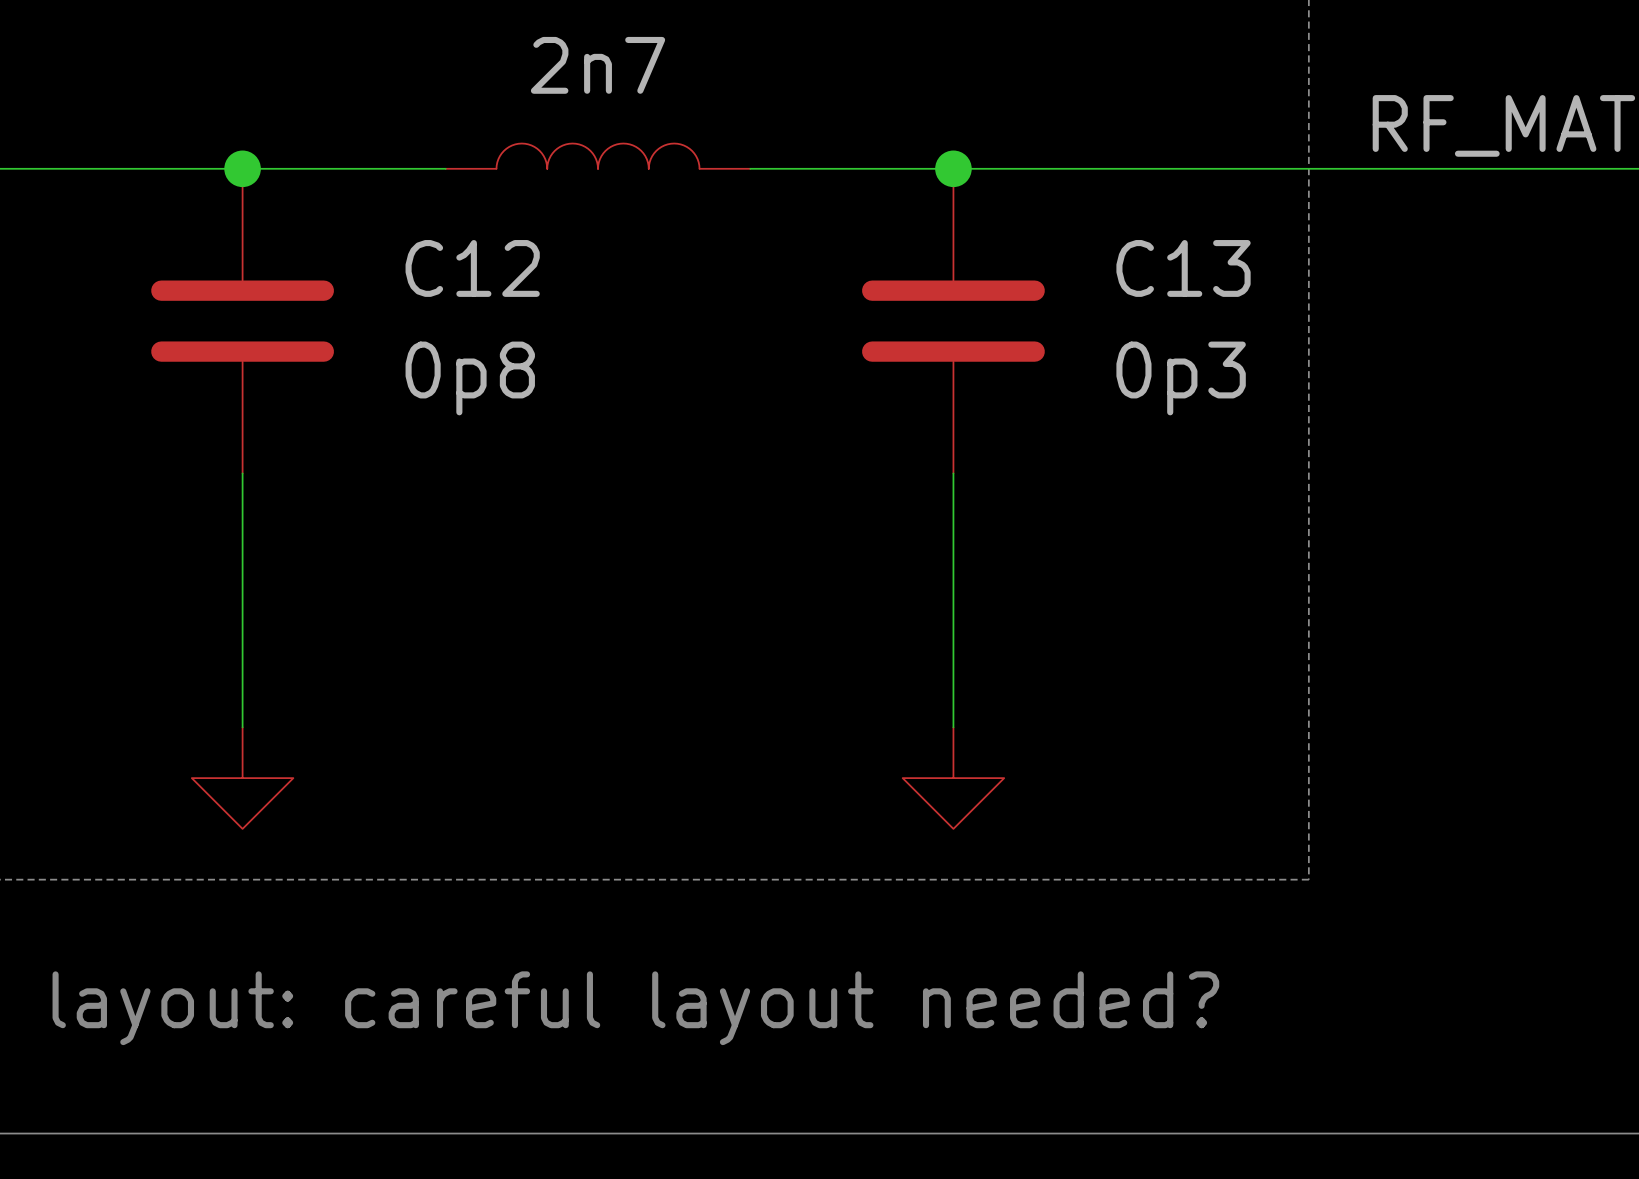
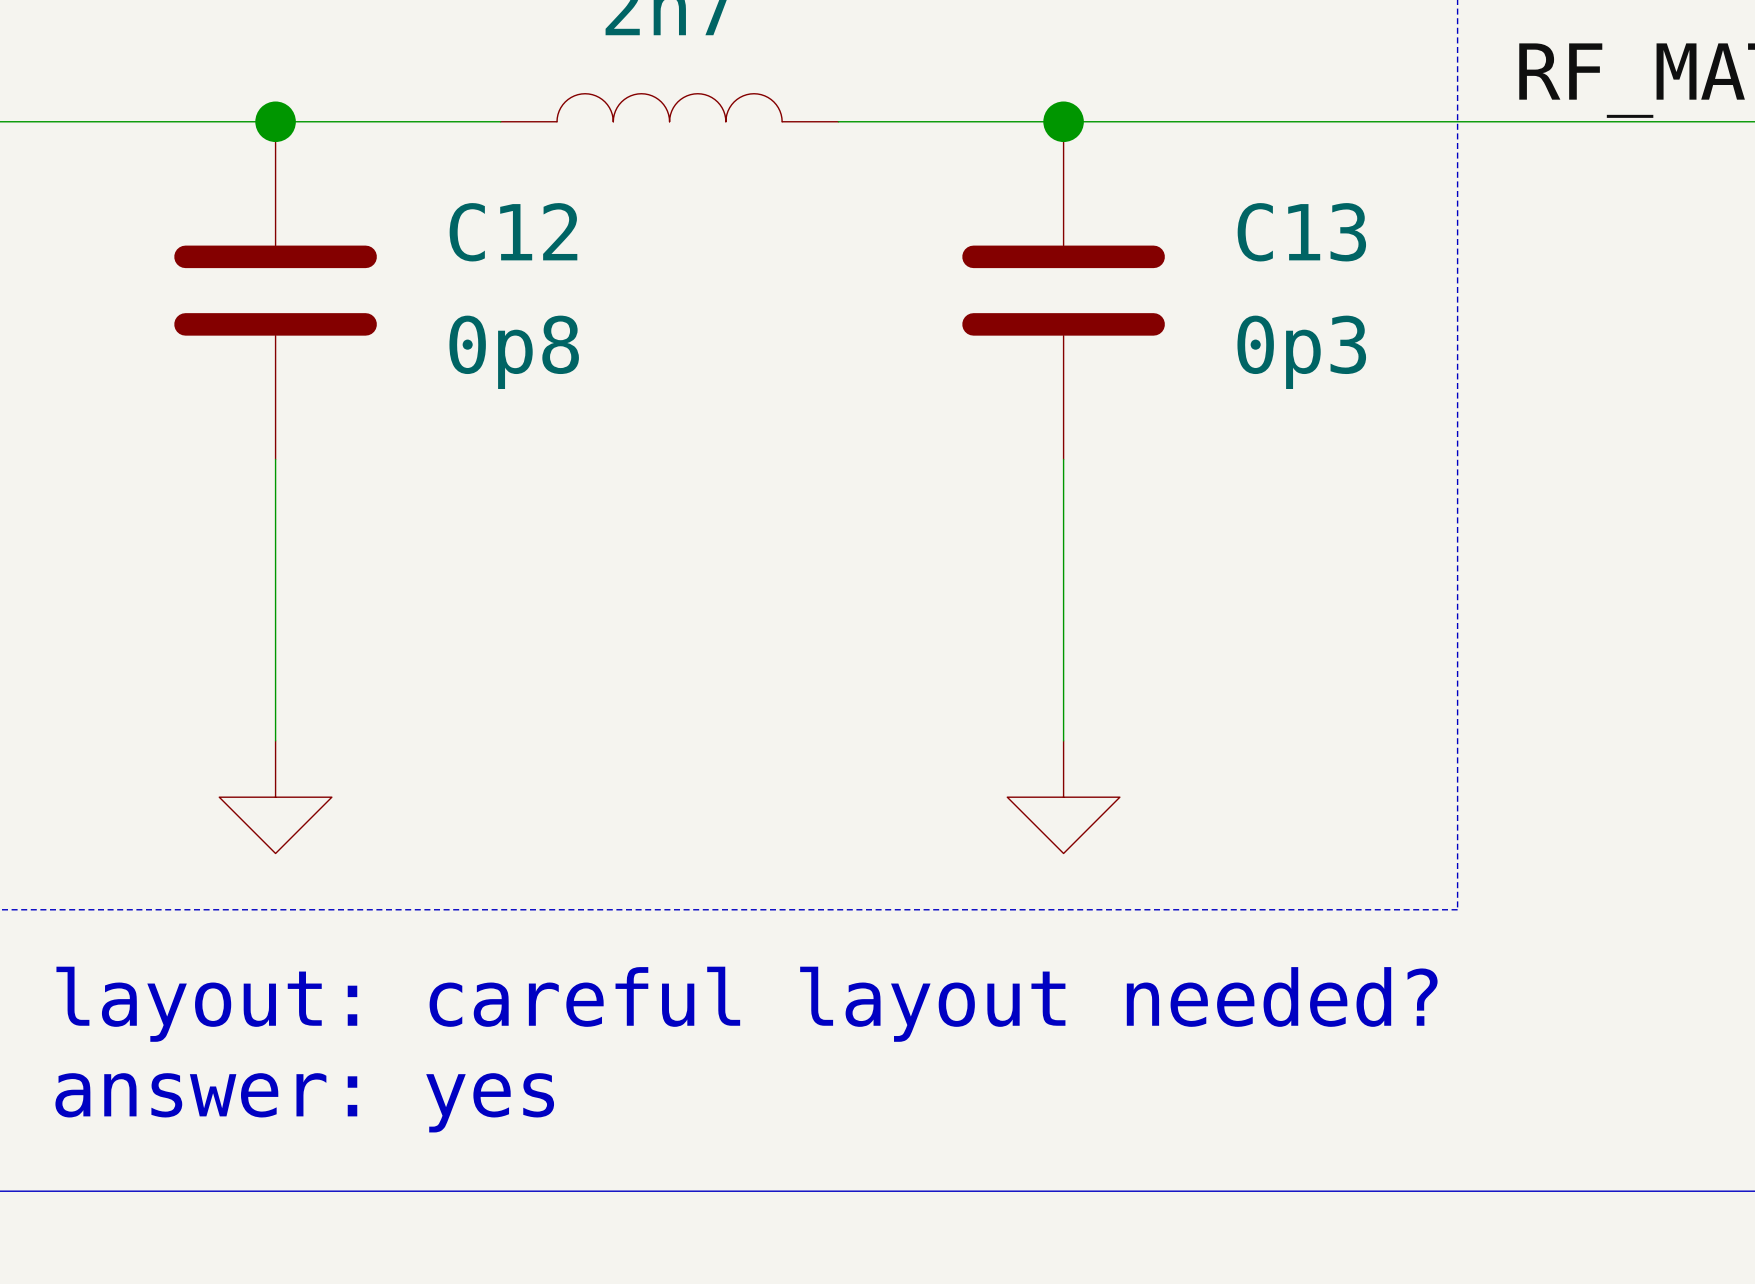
text position: layout: careful layout needed? (635, 1008) -> layout: careful layout needed? (747, 1004)
text: none -> answer: yes (304, 1102)

